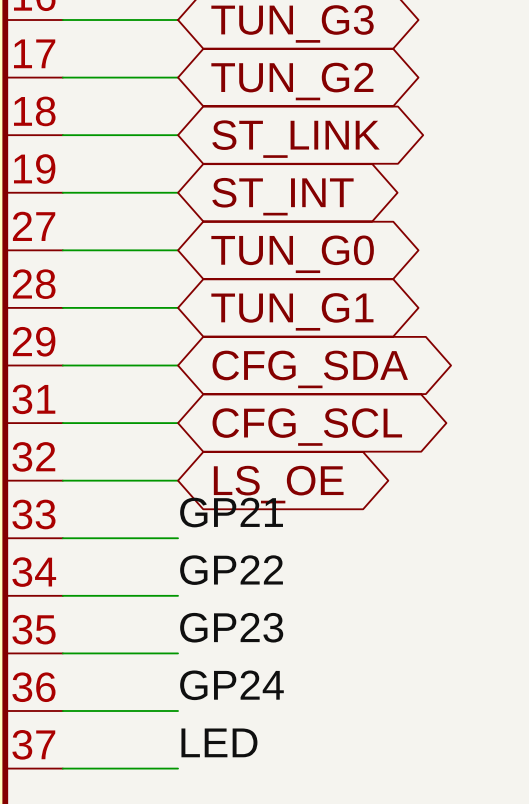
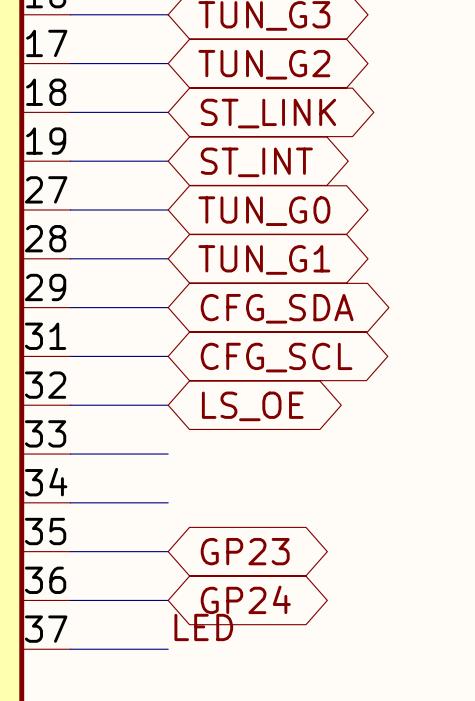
label: GP21 (231, 512) -> none
label: GP22 (231, 570) -> none
label: GP23 (231, 627) -> none
global label: none -> GP23 (245, 551)
label: GP24 (231, 685) -> none
global label: none -> GP24 (245, 599)

